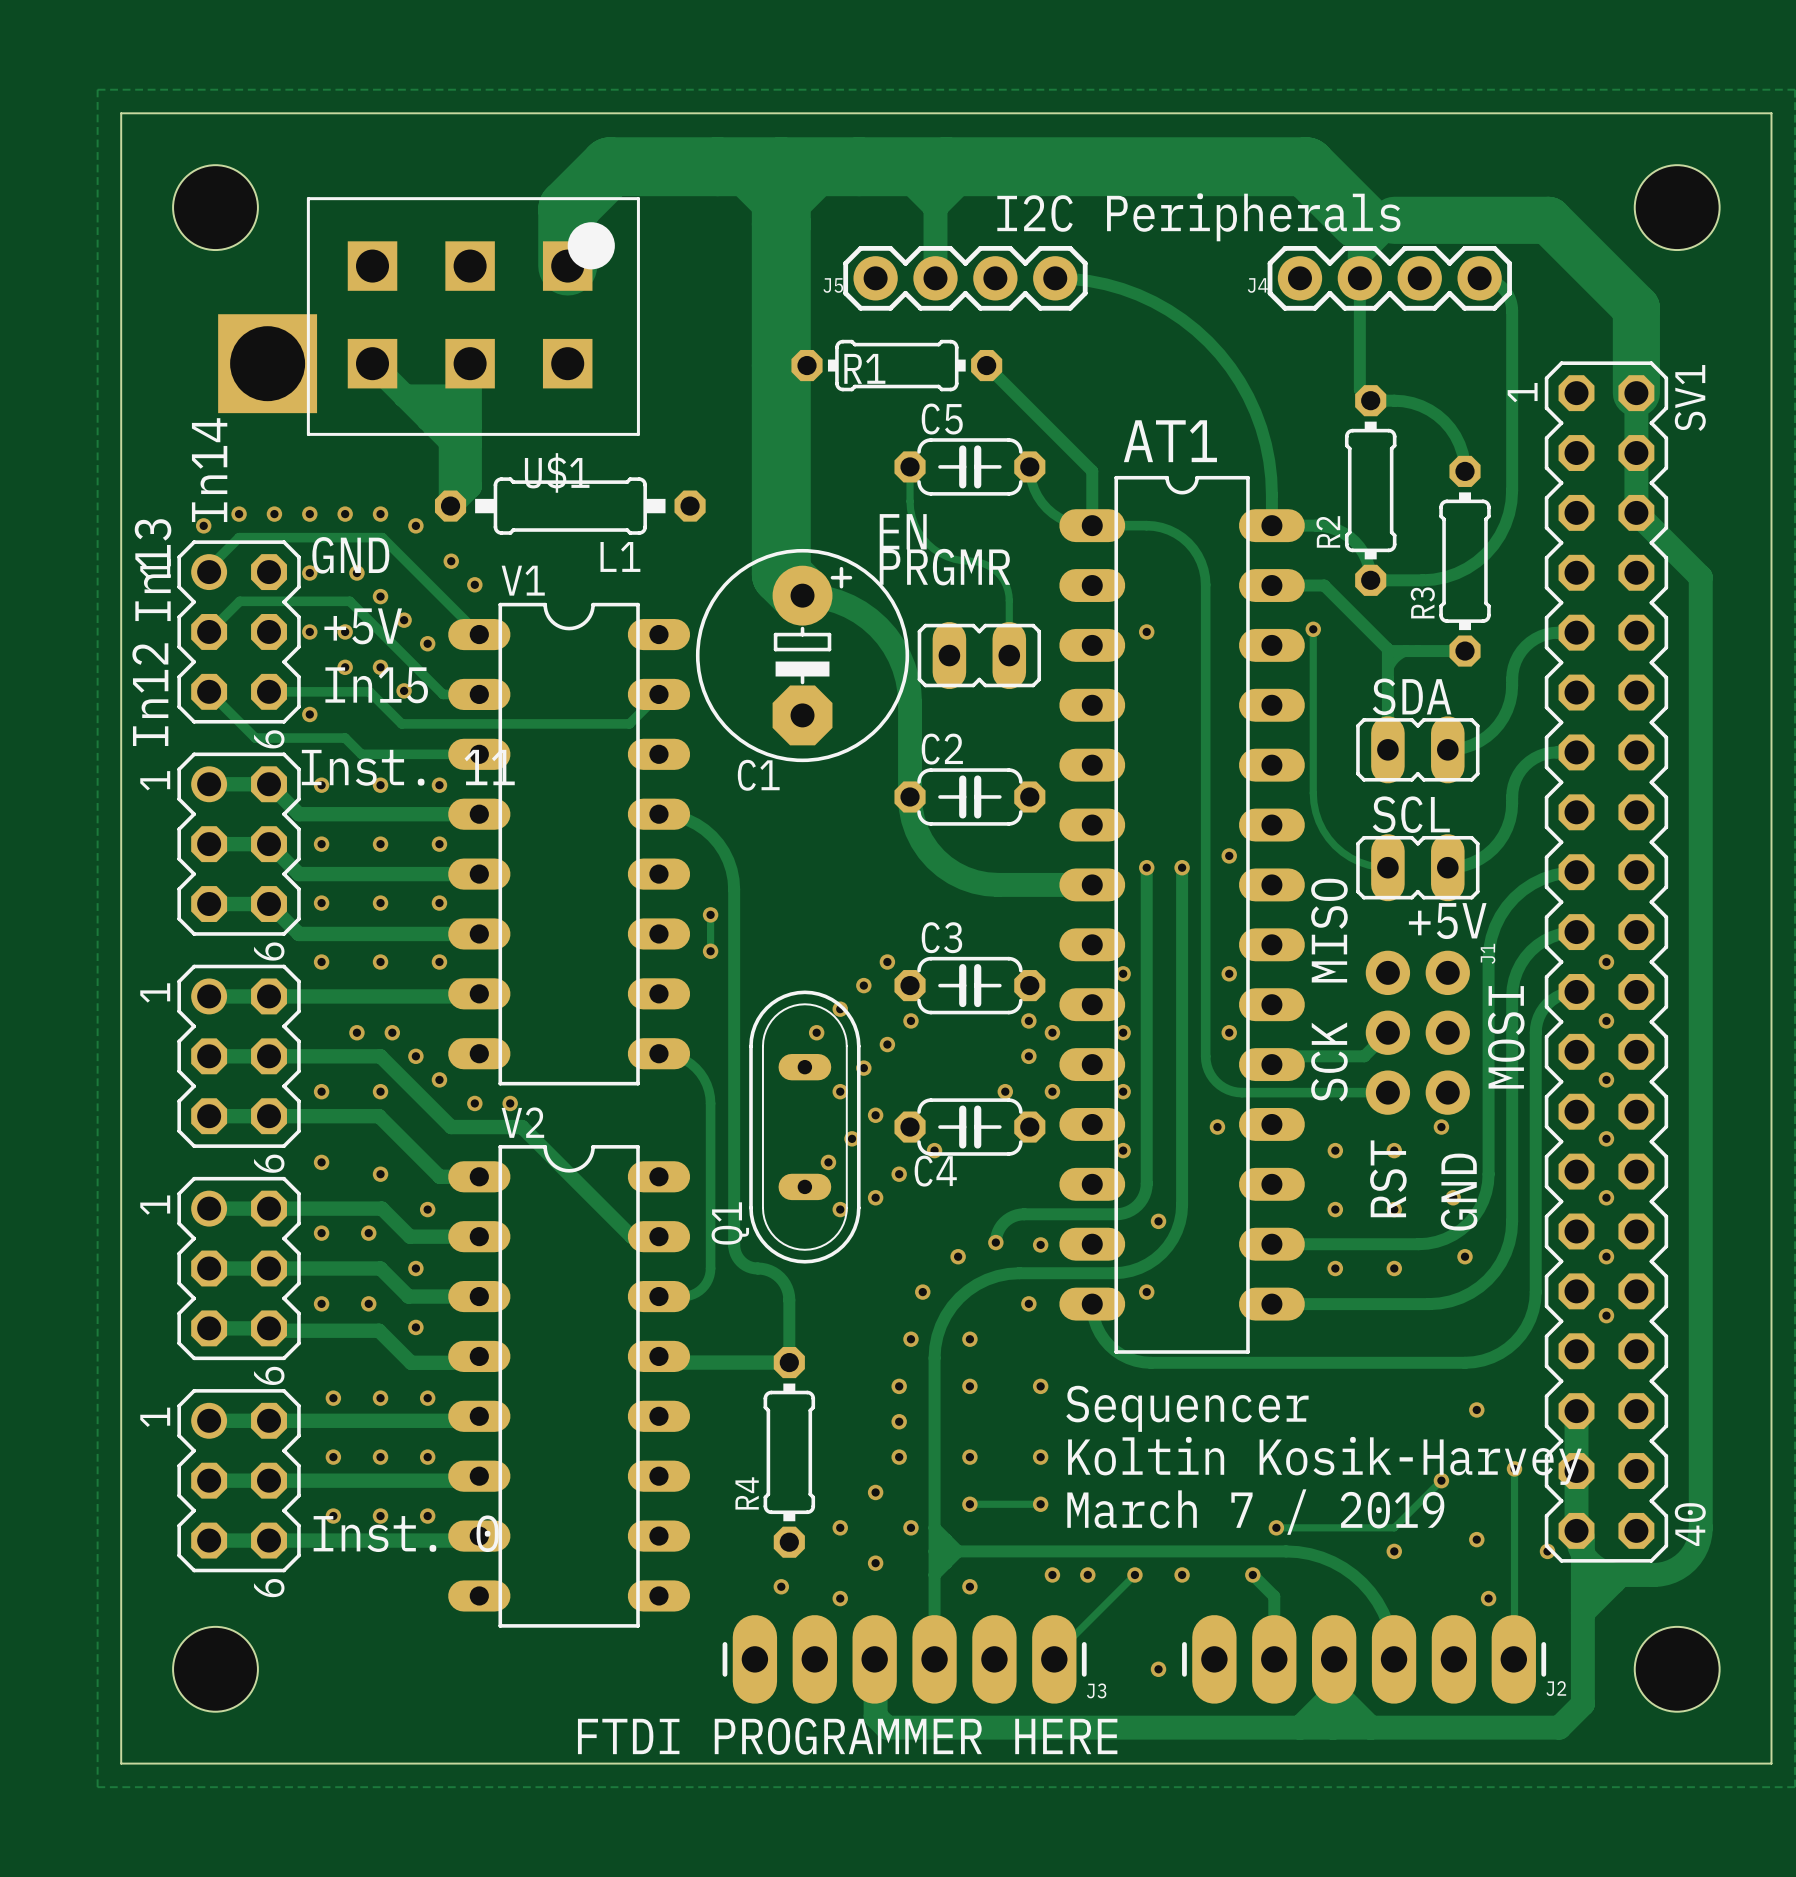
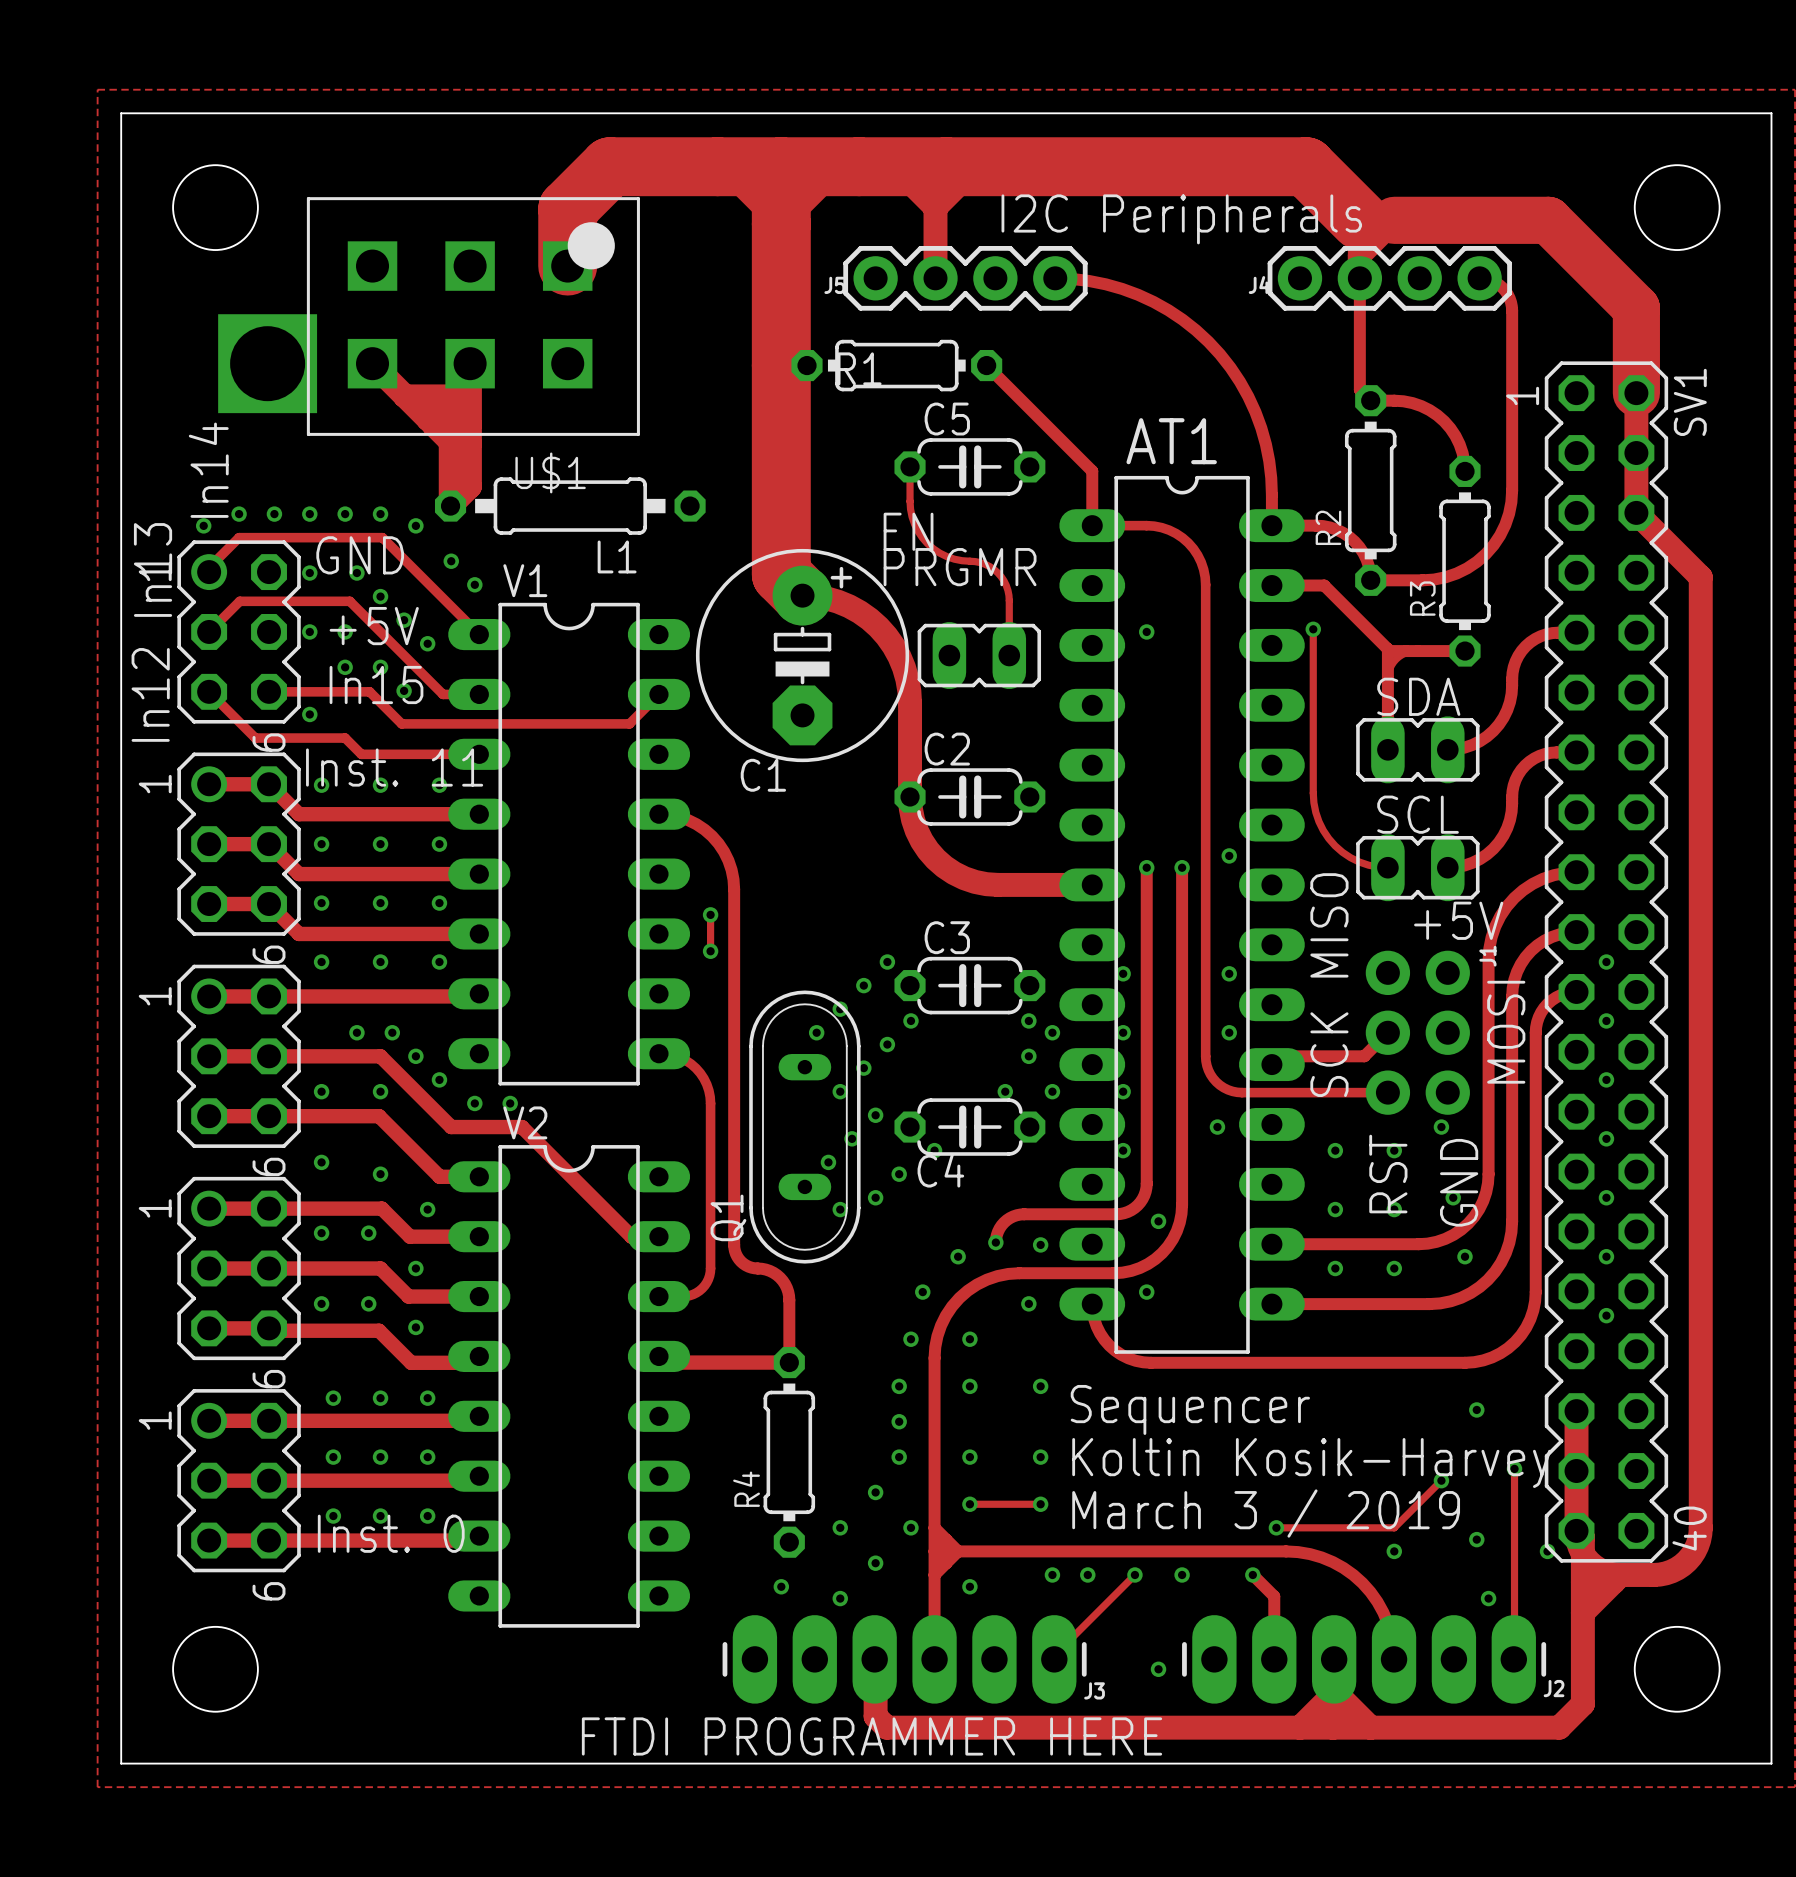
track: (1029, 466) (1034, 489) (1046, 508) (1066, 521) (1092, 525) -> none
text: March 7 / 2019 (1255, 1512) -> March 3 / 2019 (1266, 1513)

